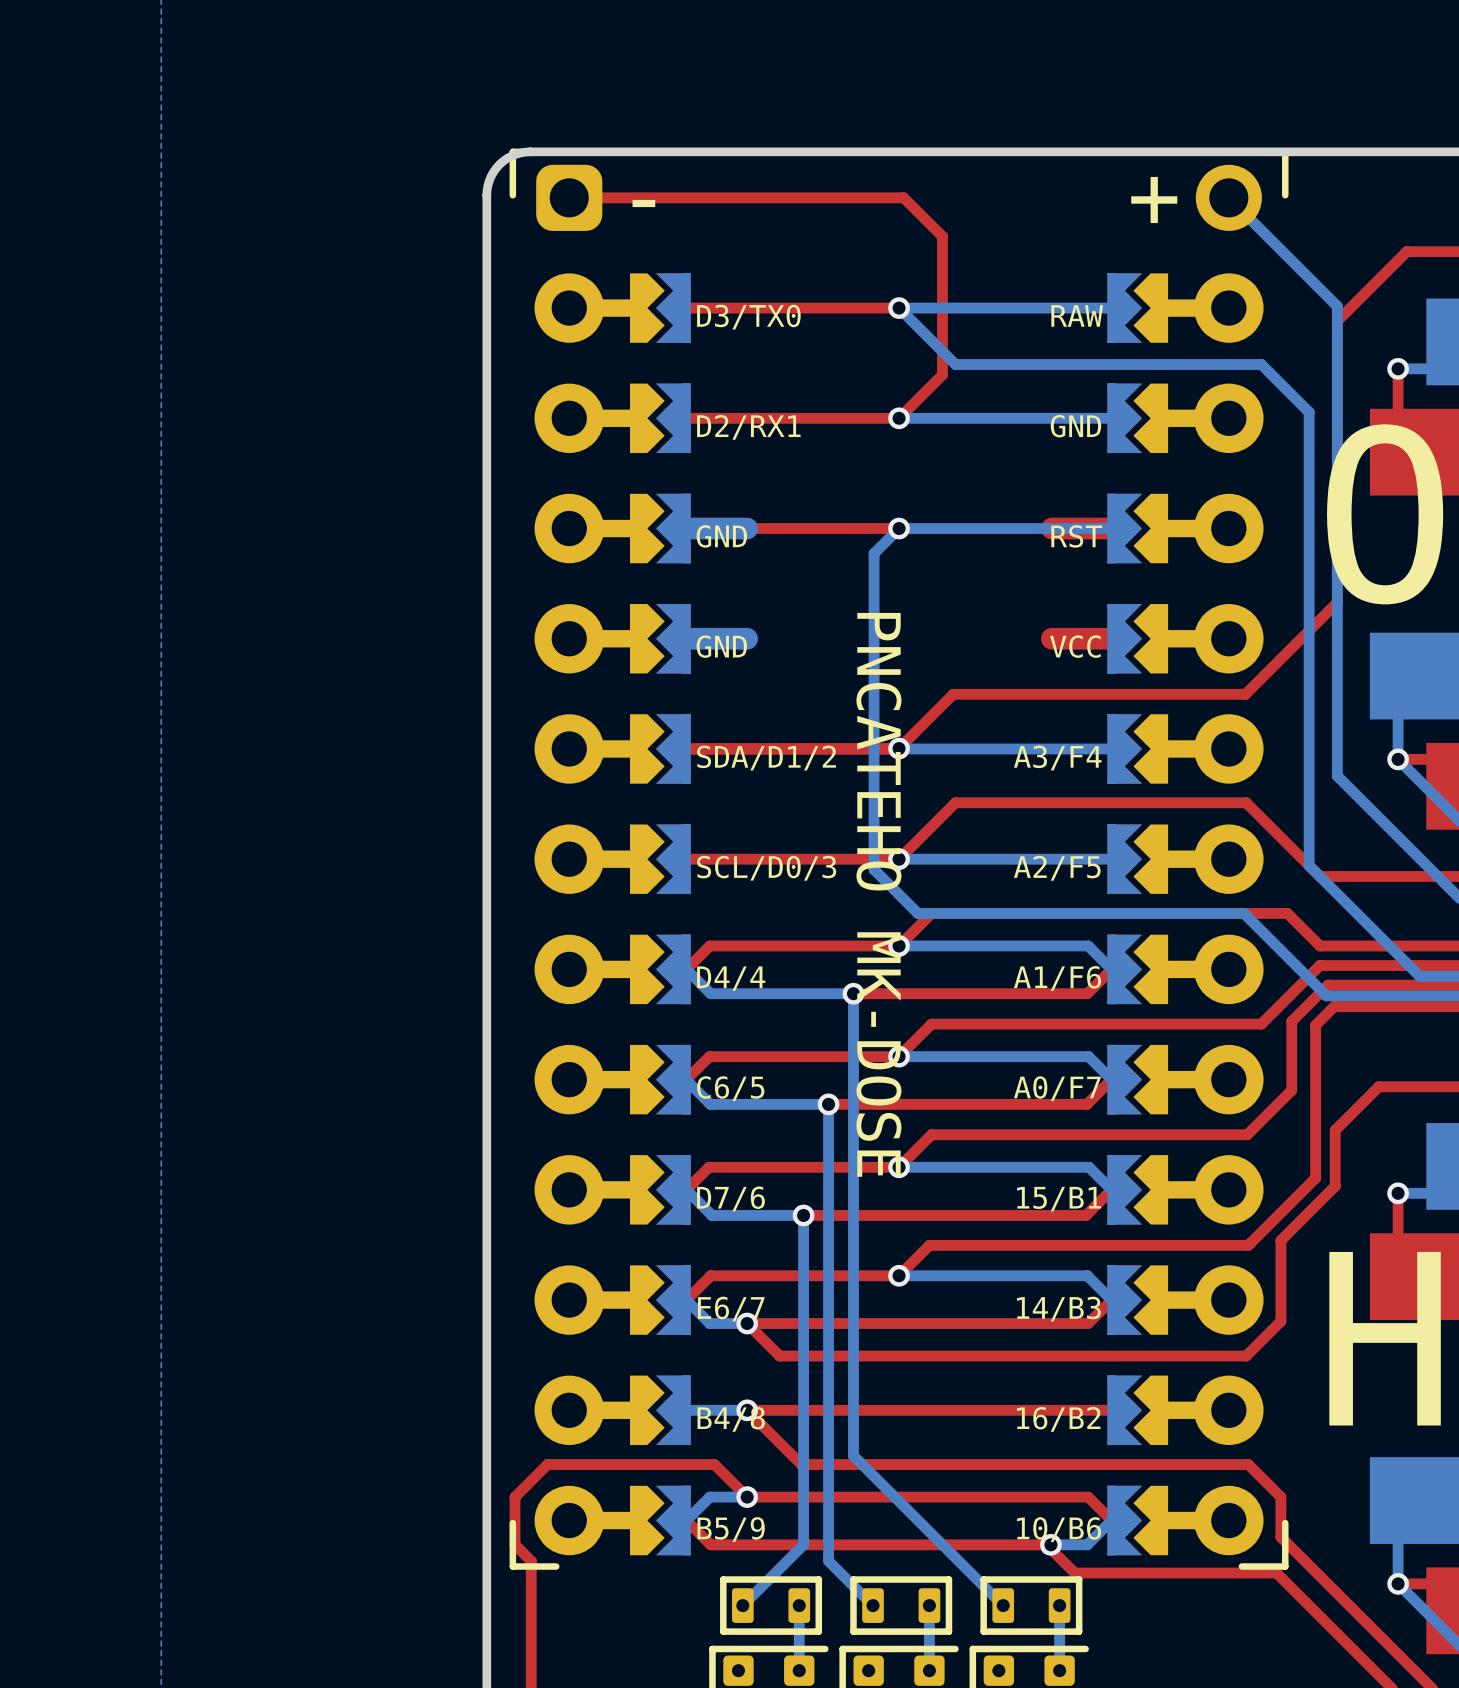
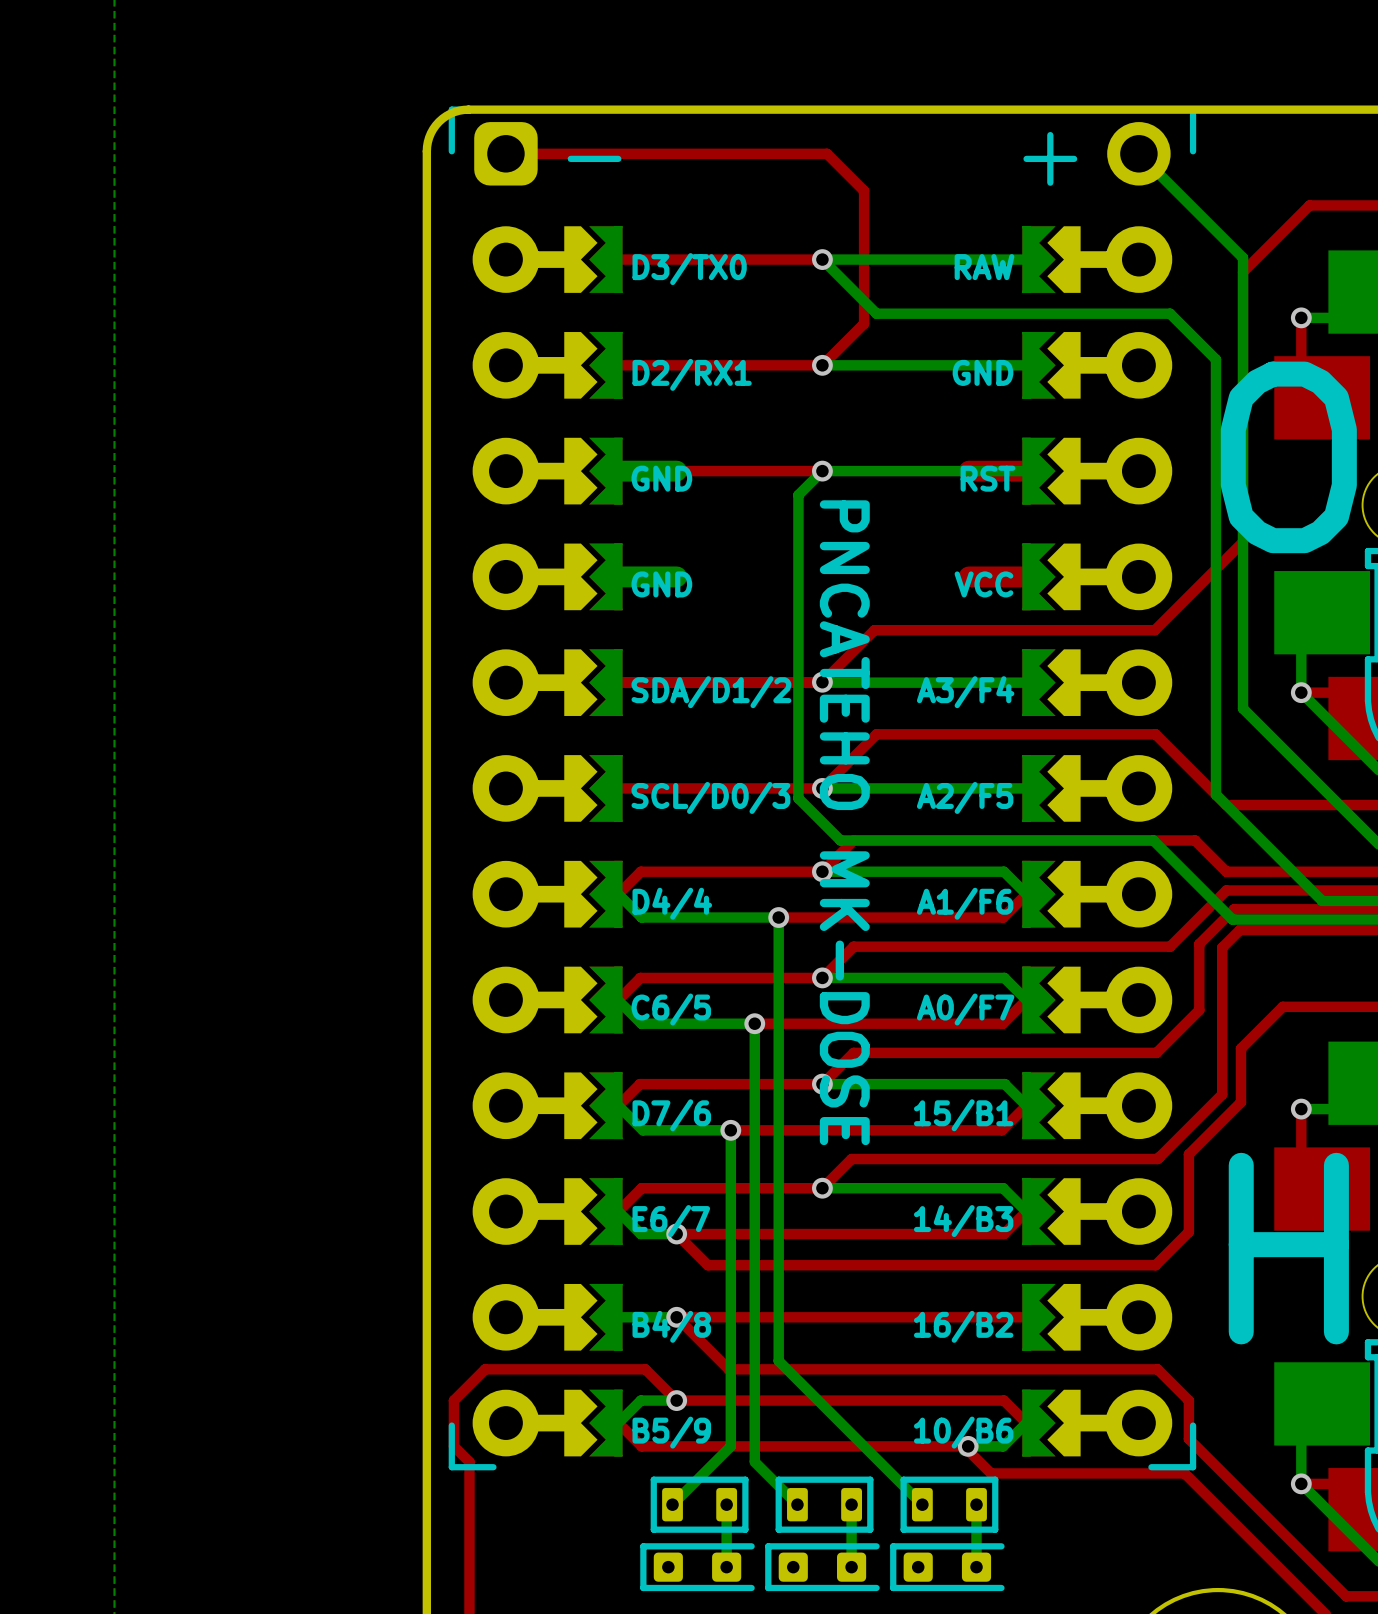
text position: PNCATEHO MK-DOSE (878, 894) -> PNCATEHO MK-DOSE (844, 822)

